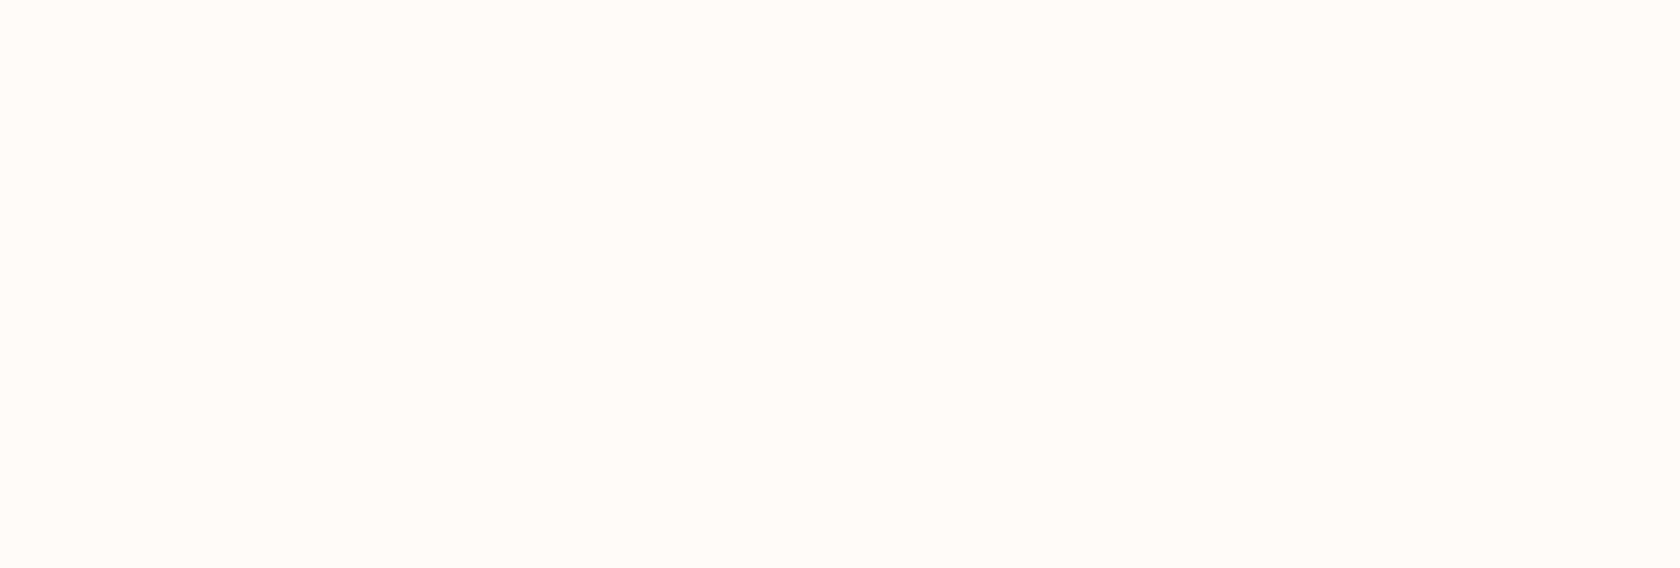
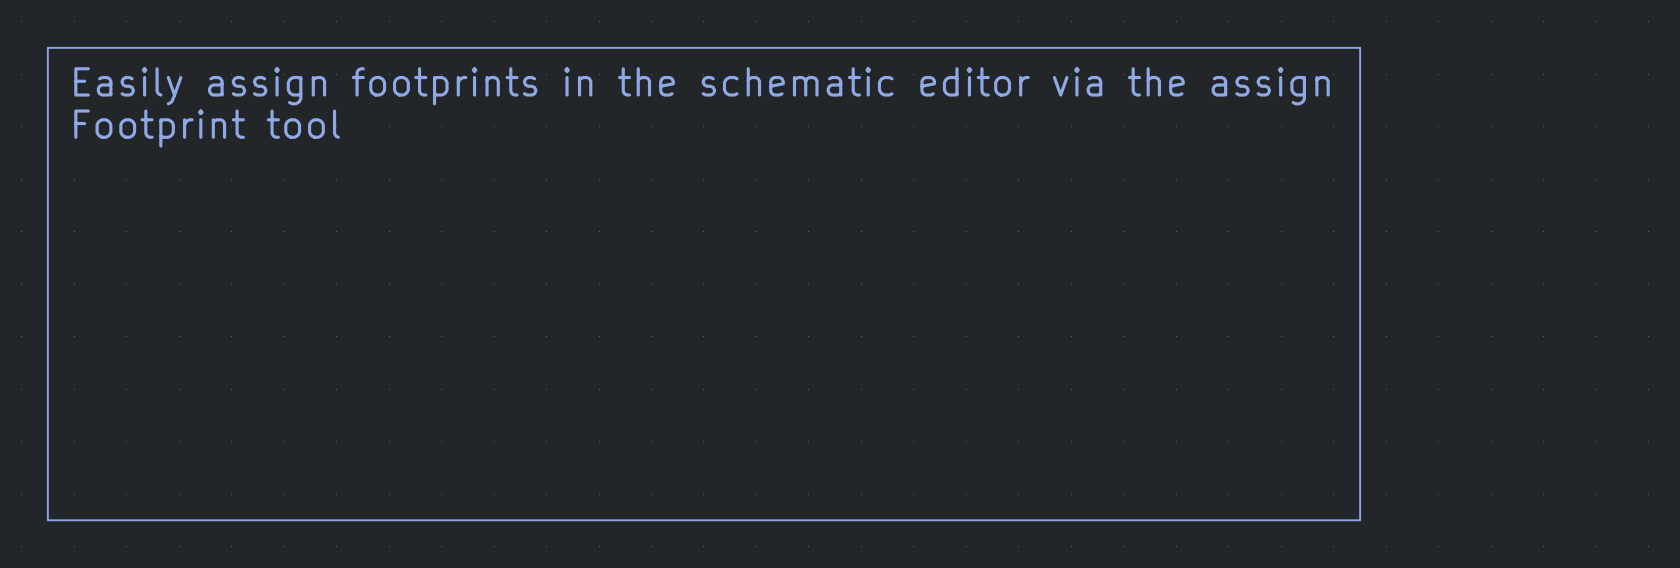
line: none -> (47, 47) (1360, 47) (1360, 520) (47, 520) (47, 47)
text: none -> Easily assign footprints in the schematic editor via the assign (702, 86)
text: none -> Footprint tool (207, 128)

